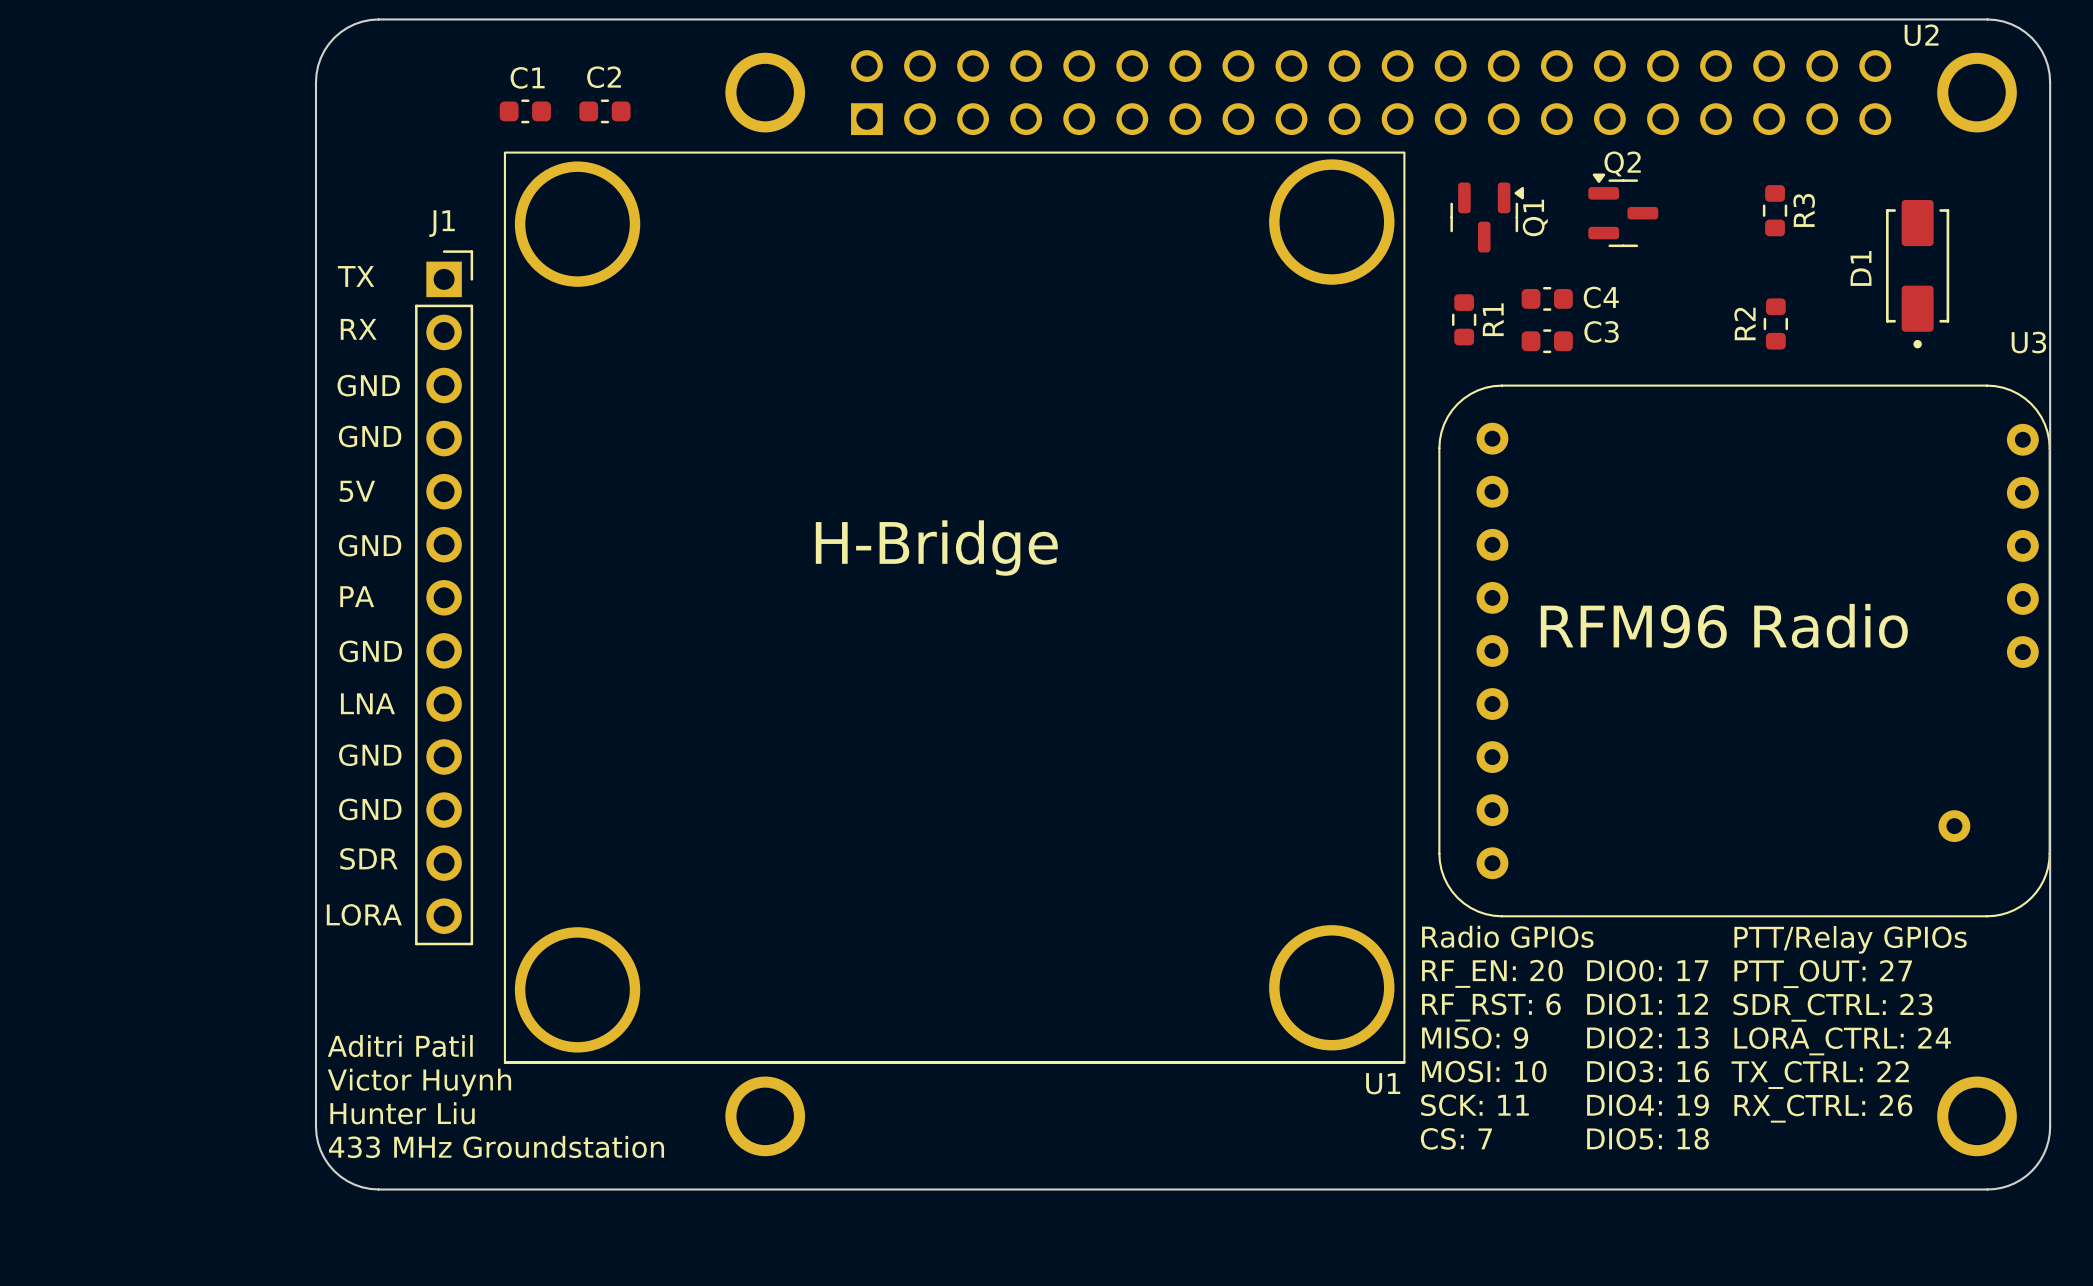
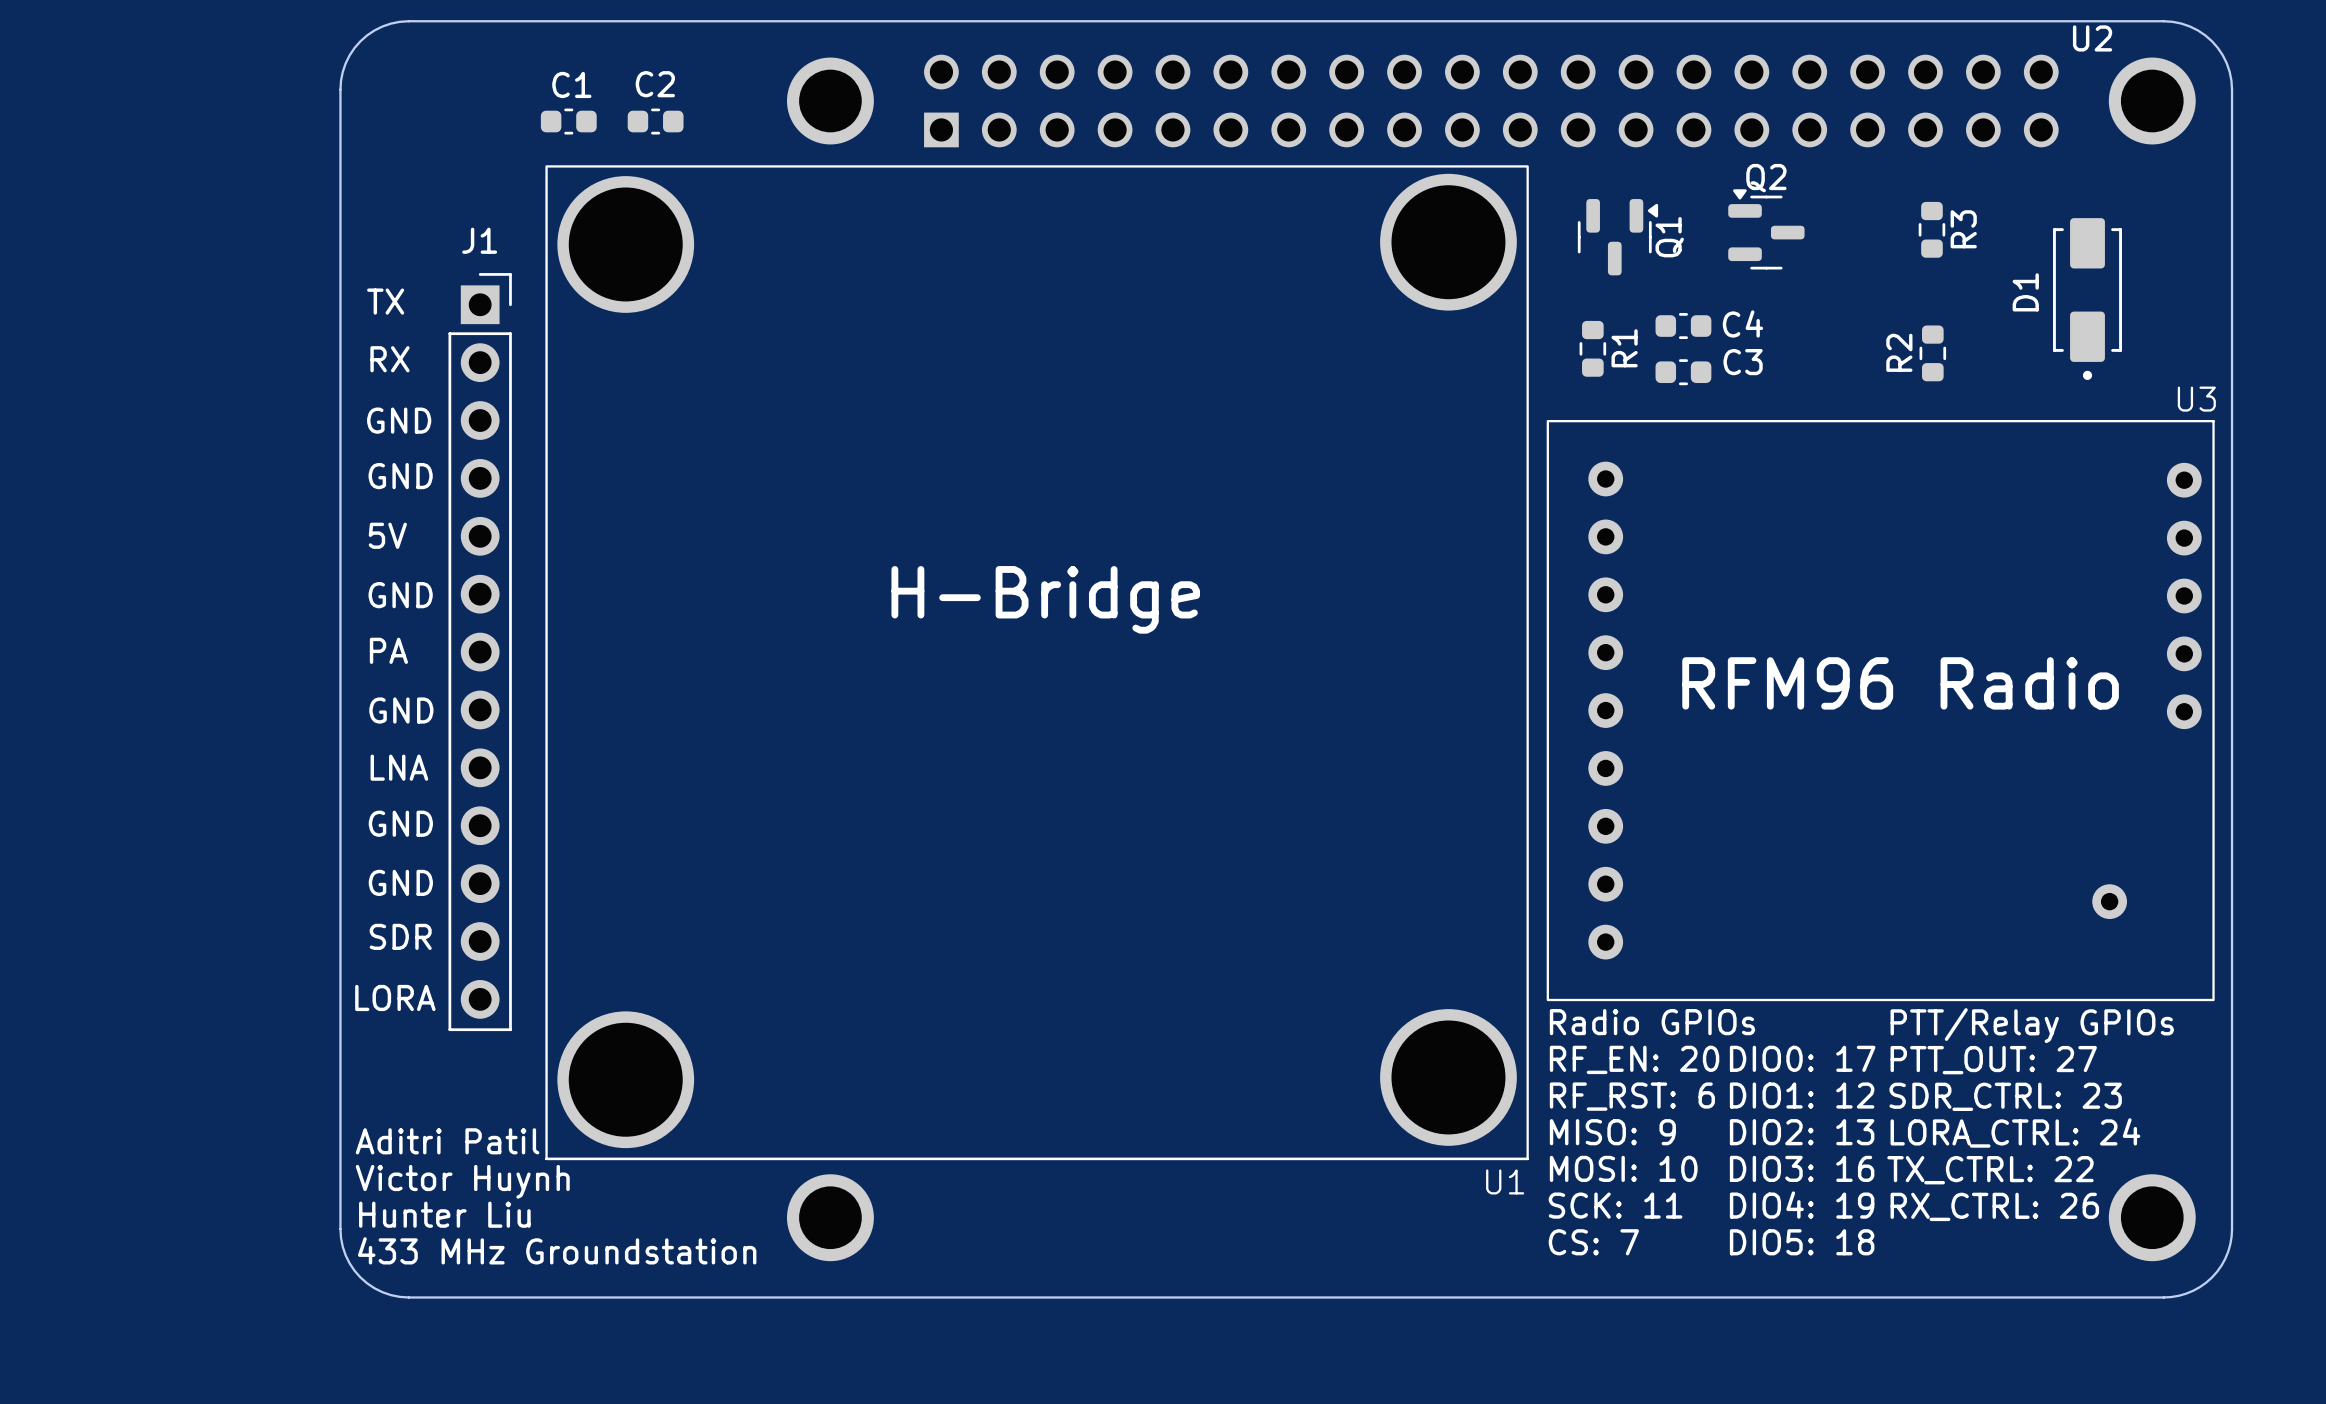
U3 footprint: [1438, 384, 2051, 918] -> [1546, 419, 2215, 1002]

